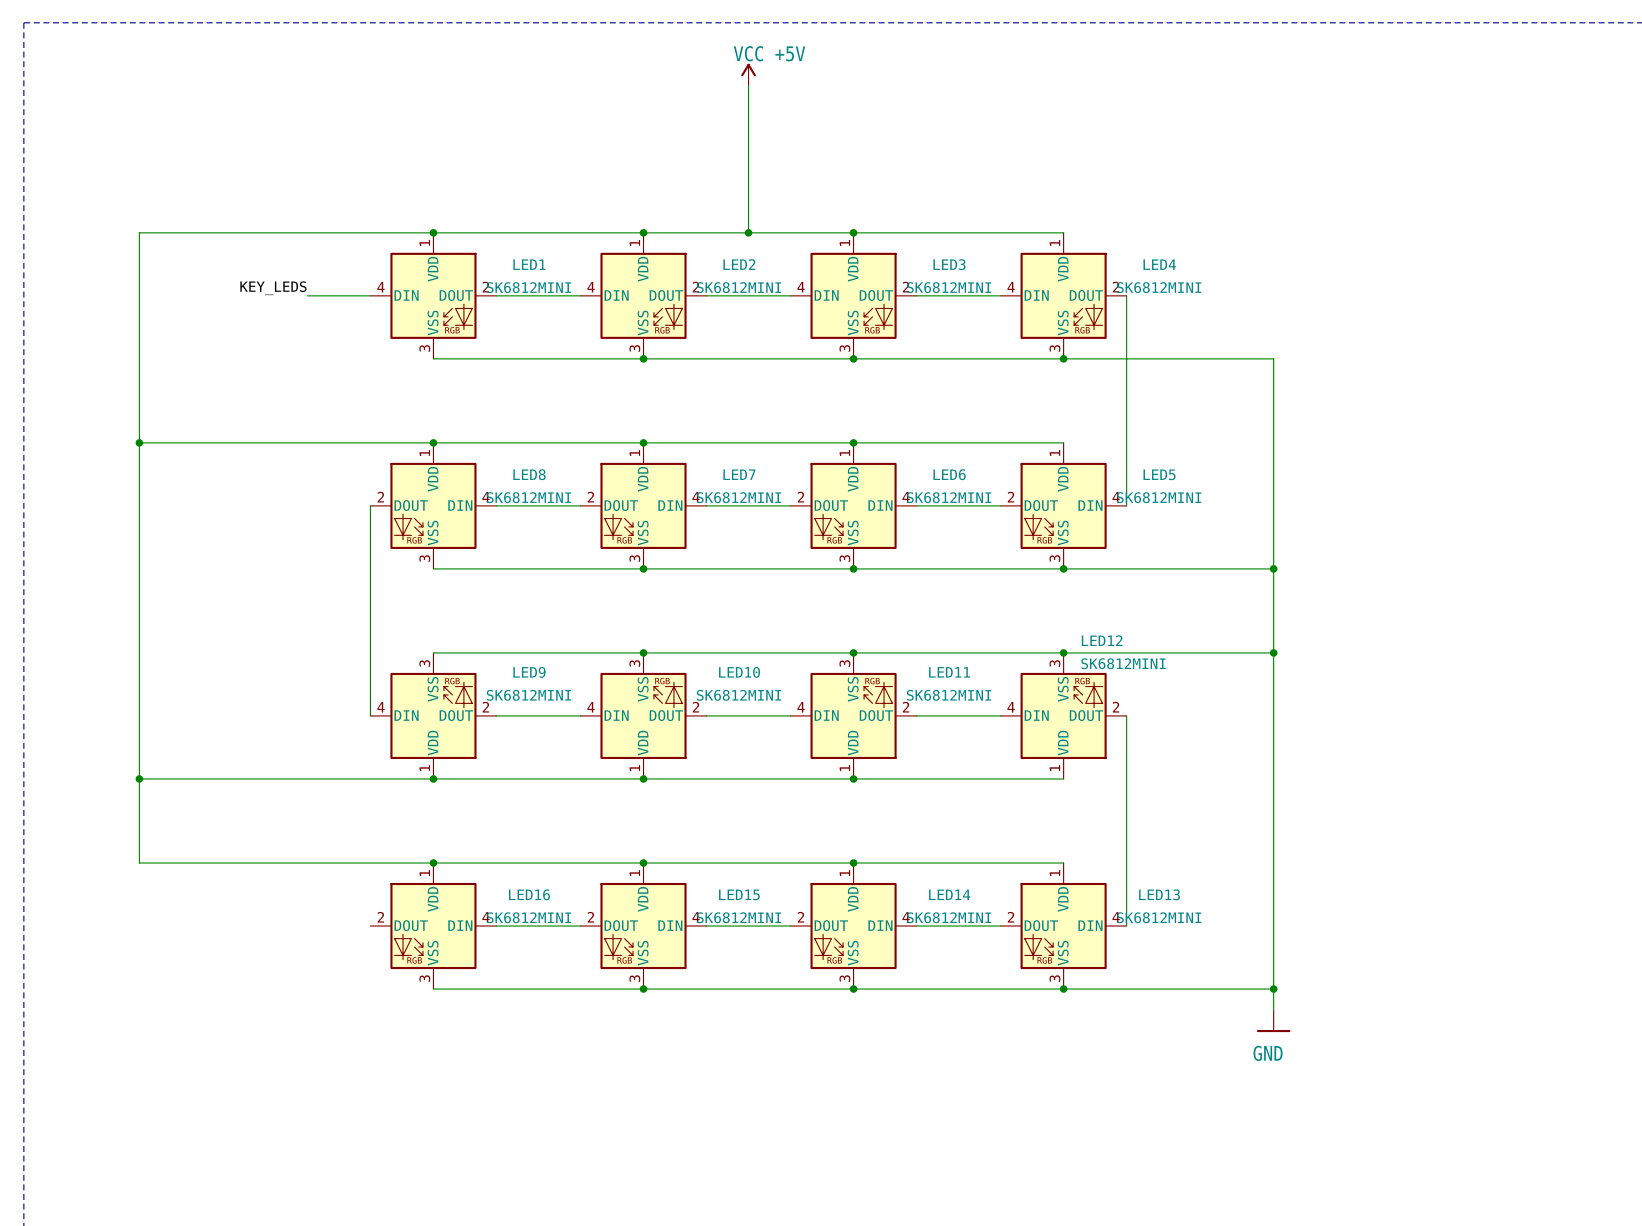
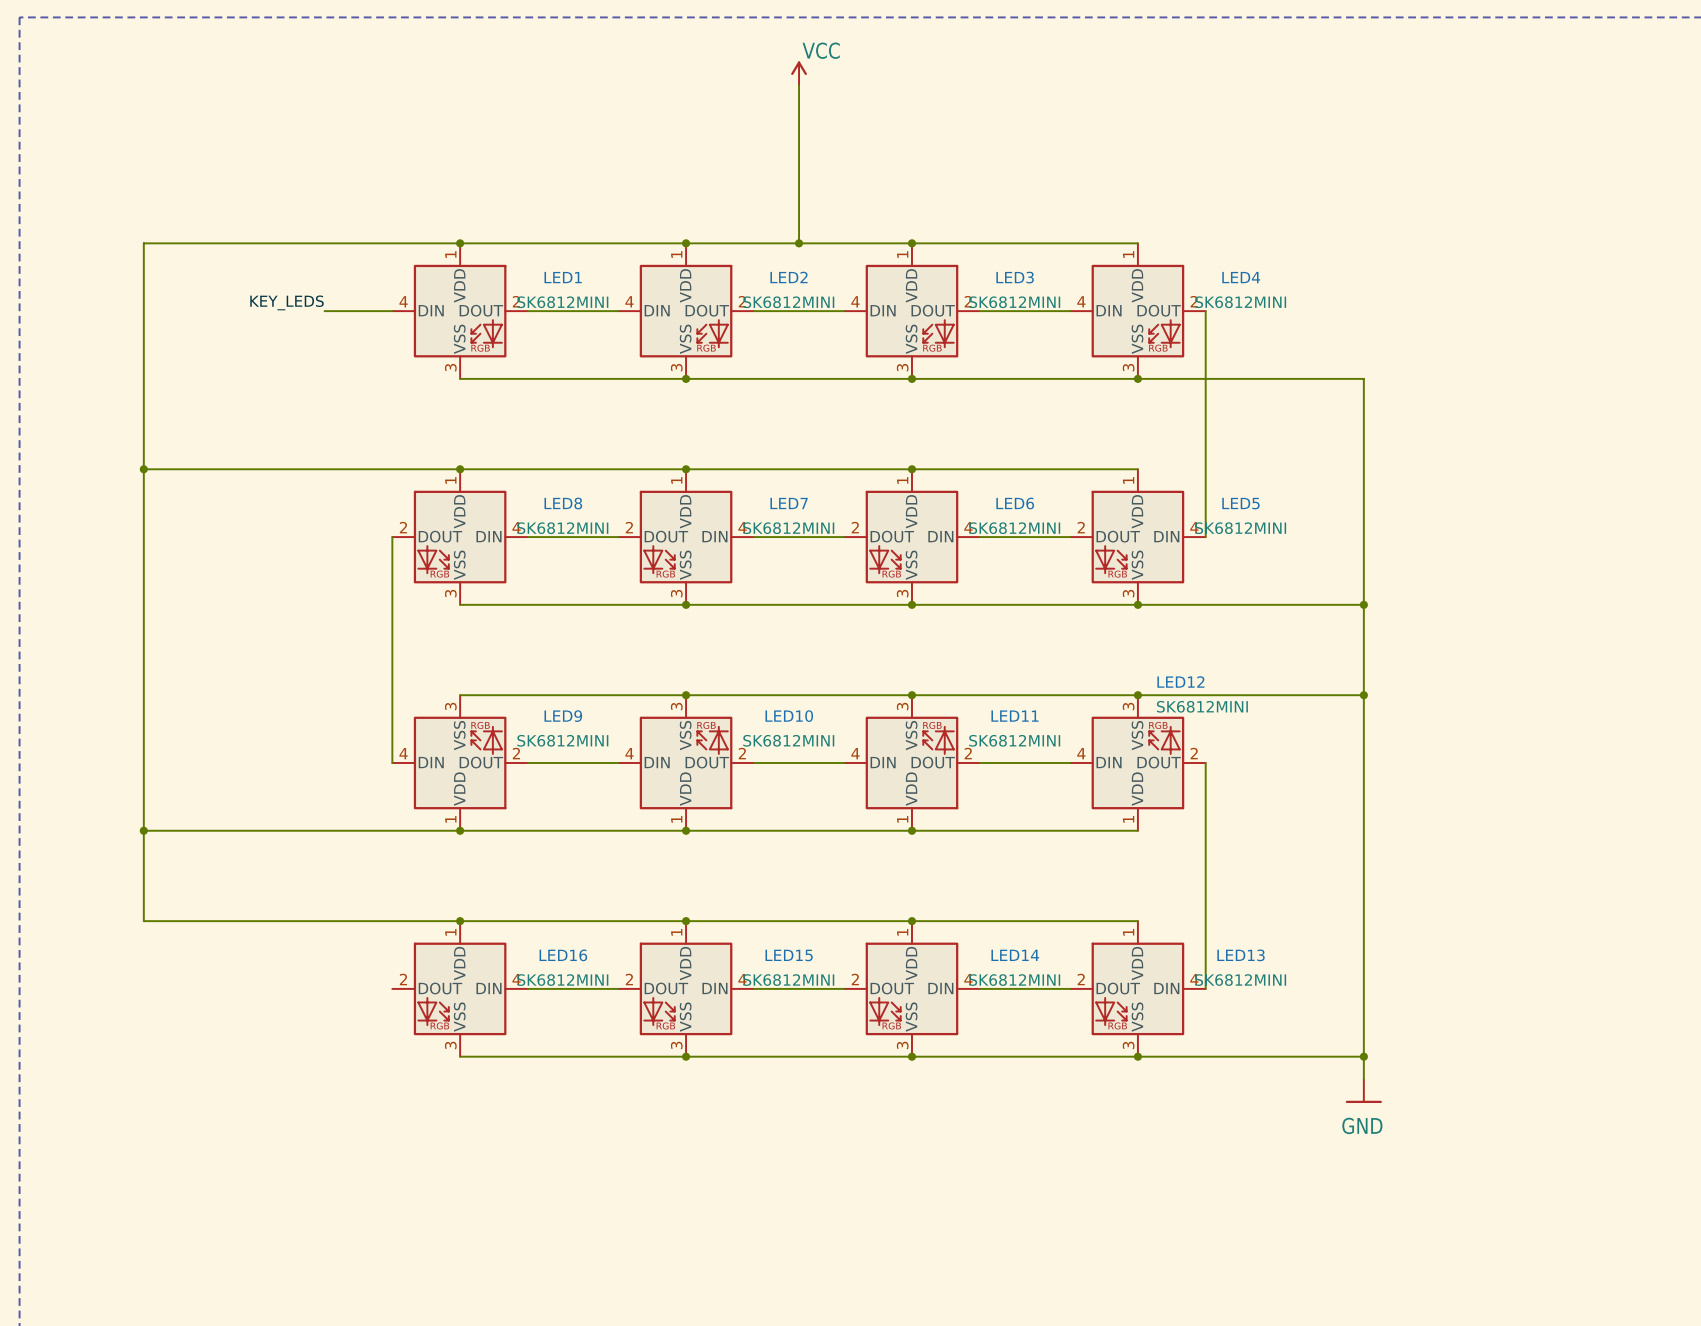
power symbol: VCC +5V (748, 74) -> VCC (799, 73)

